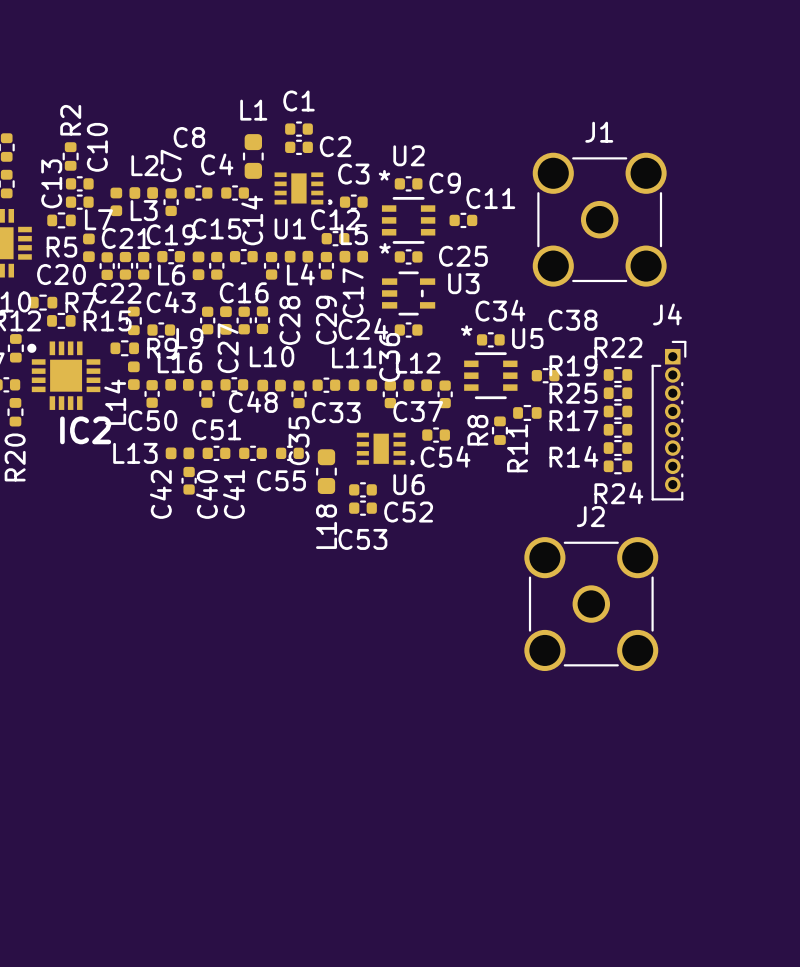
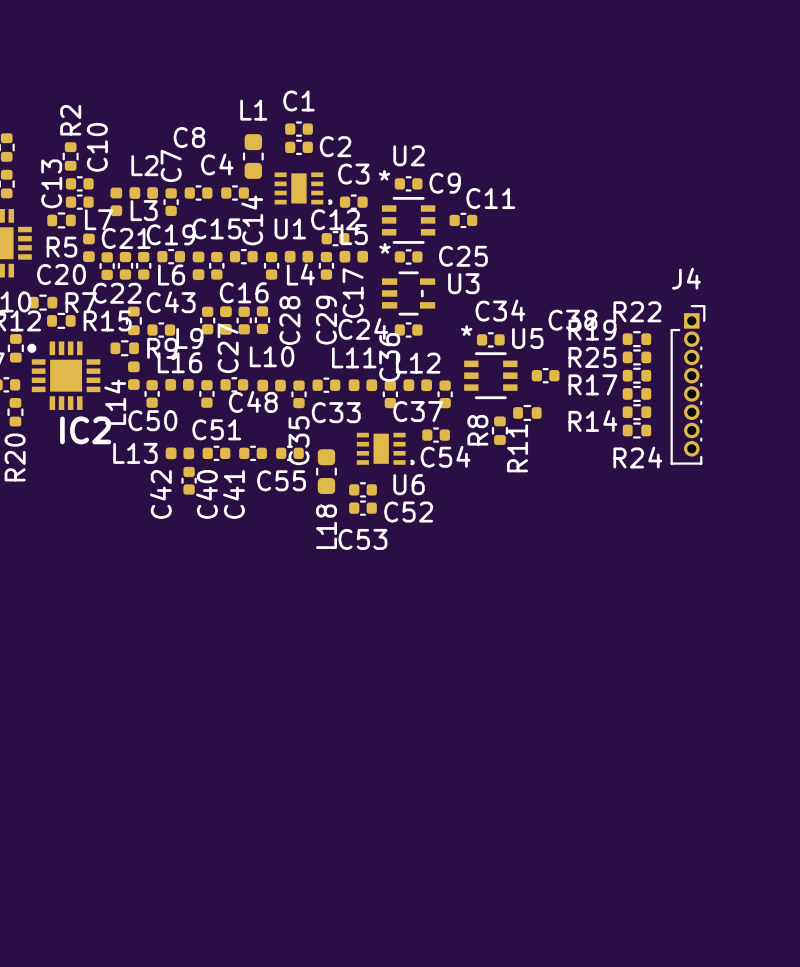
J1: (599, 219) -> none
R22 position: (617, 374) -> (636, 339)
R19 position: (617, 393) -> (636, 357)
R25 position: (617, 411) -> (636, 375)
J4 position: (668, 420) -> (687, 384)
R17 position: (617, 429) -> (636, 393)
R14 position: (617, 448) -> (636, 412)
R24 position: (617, 466) -> (636, 430)
J2: (591, 604) -> none

